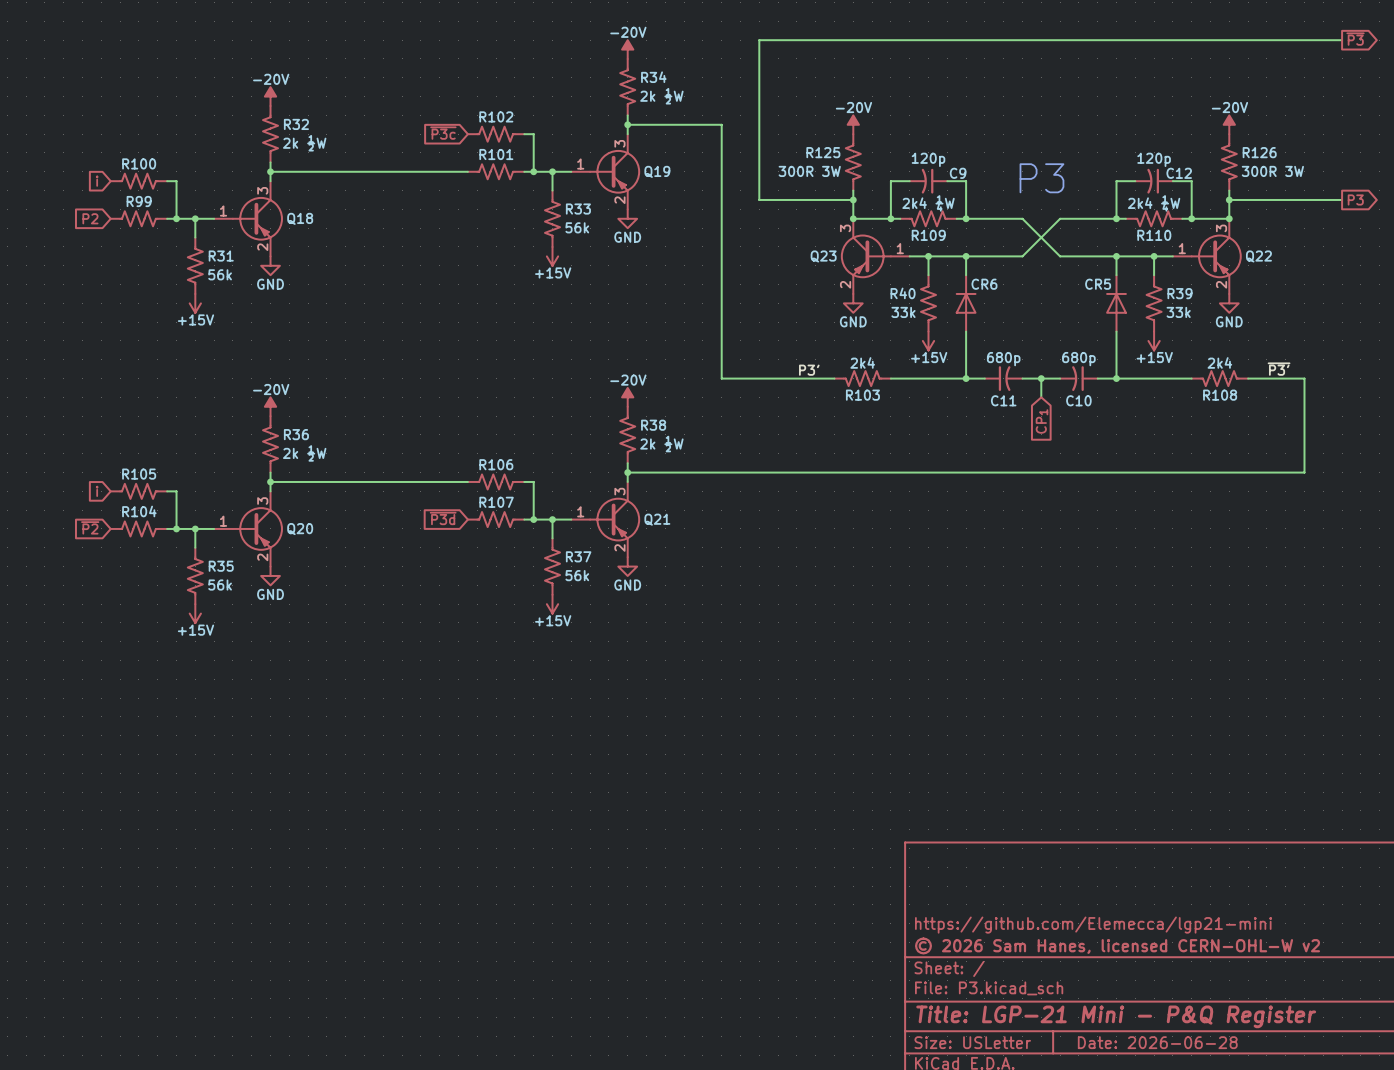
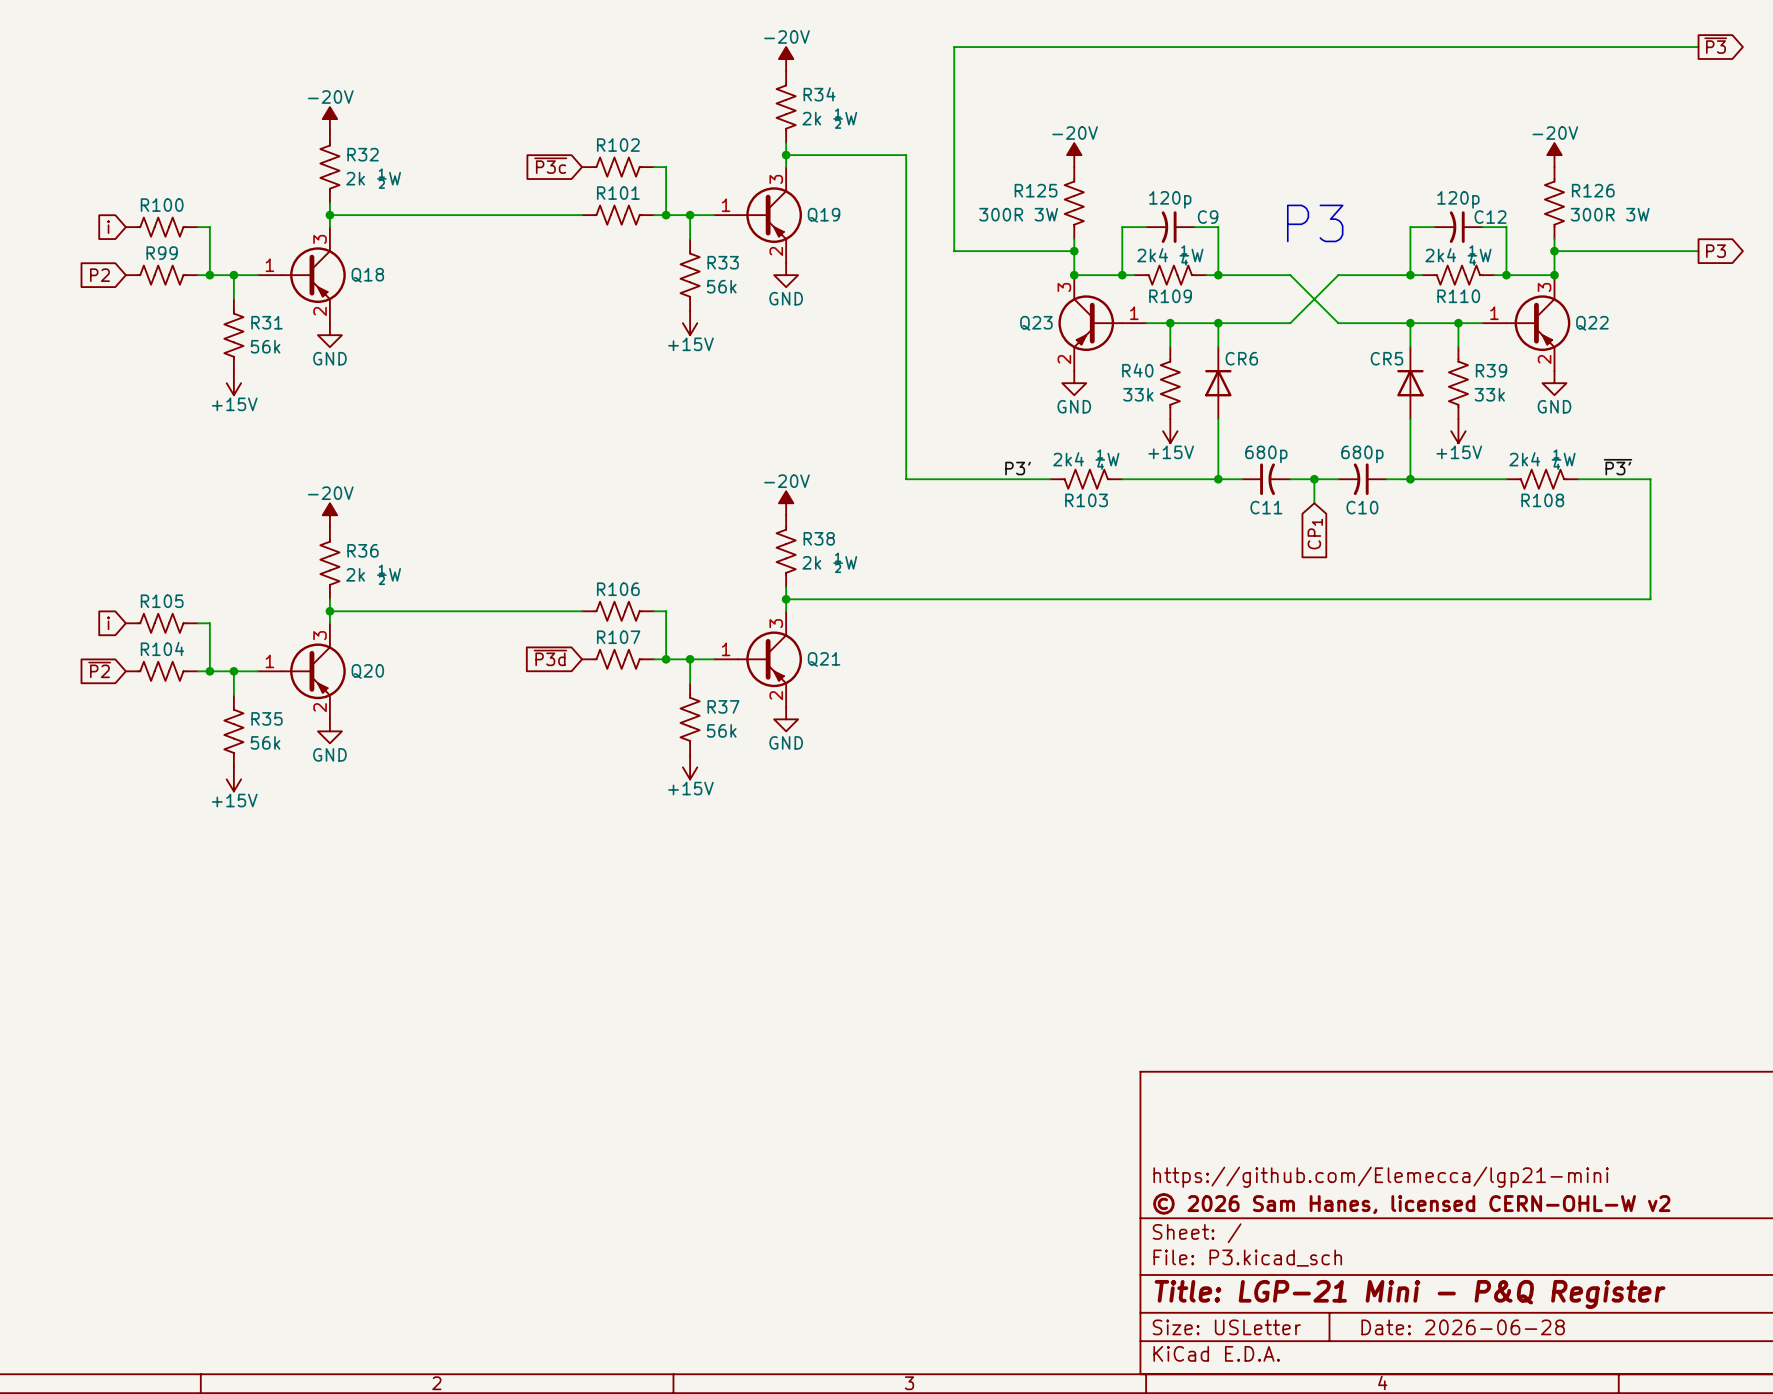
R103 value: 2k4 (862, 362) -> 2k4 ¼W (1086, 459)
R108 value: 2k4 (1219, 362) -> 2k4 ¼W (1542, 459)

